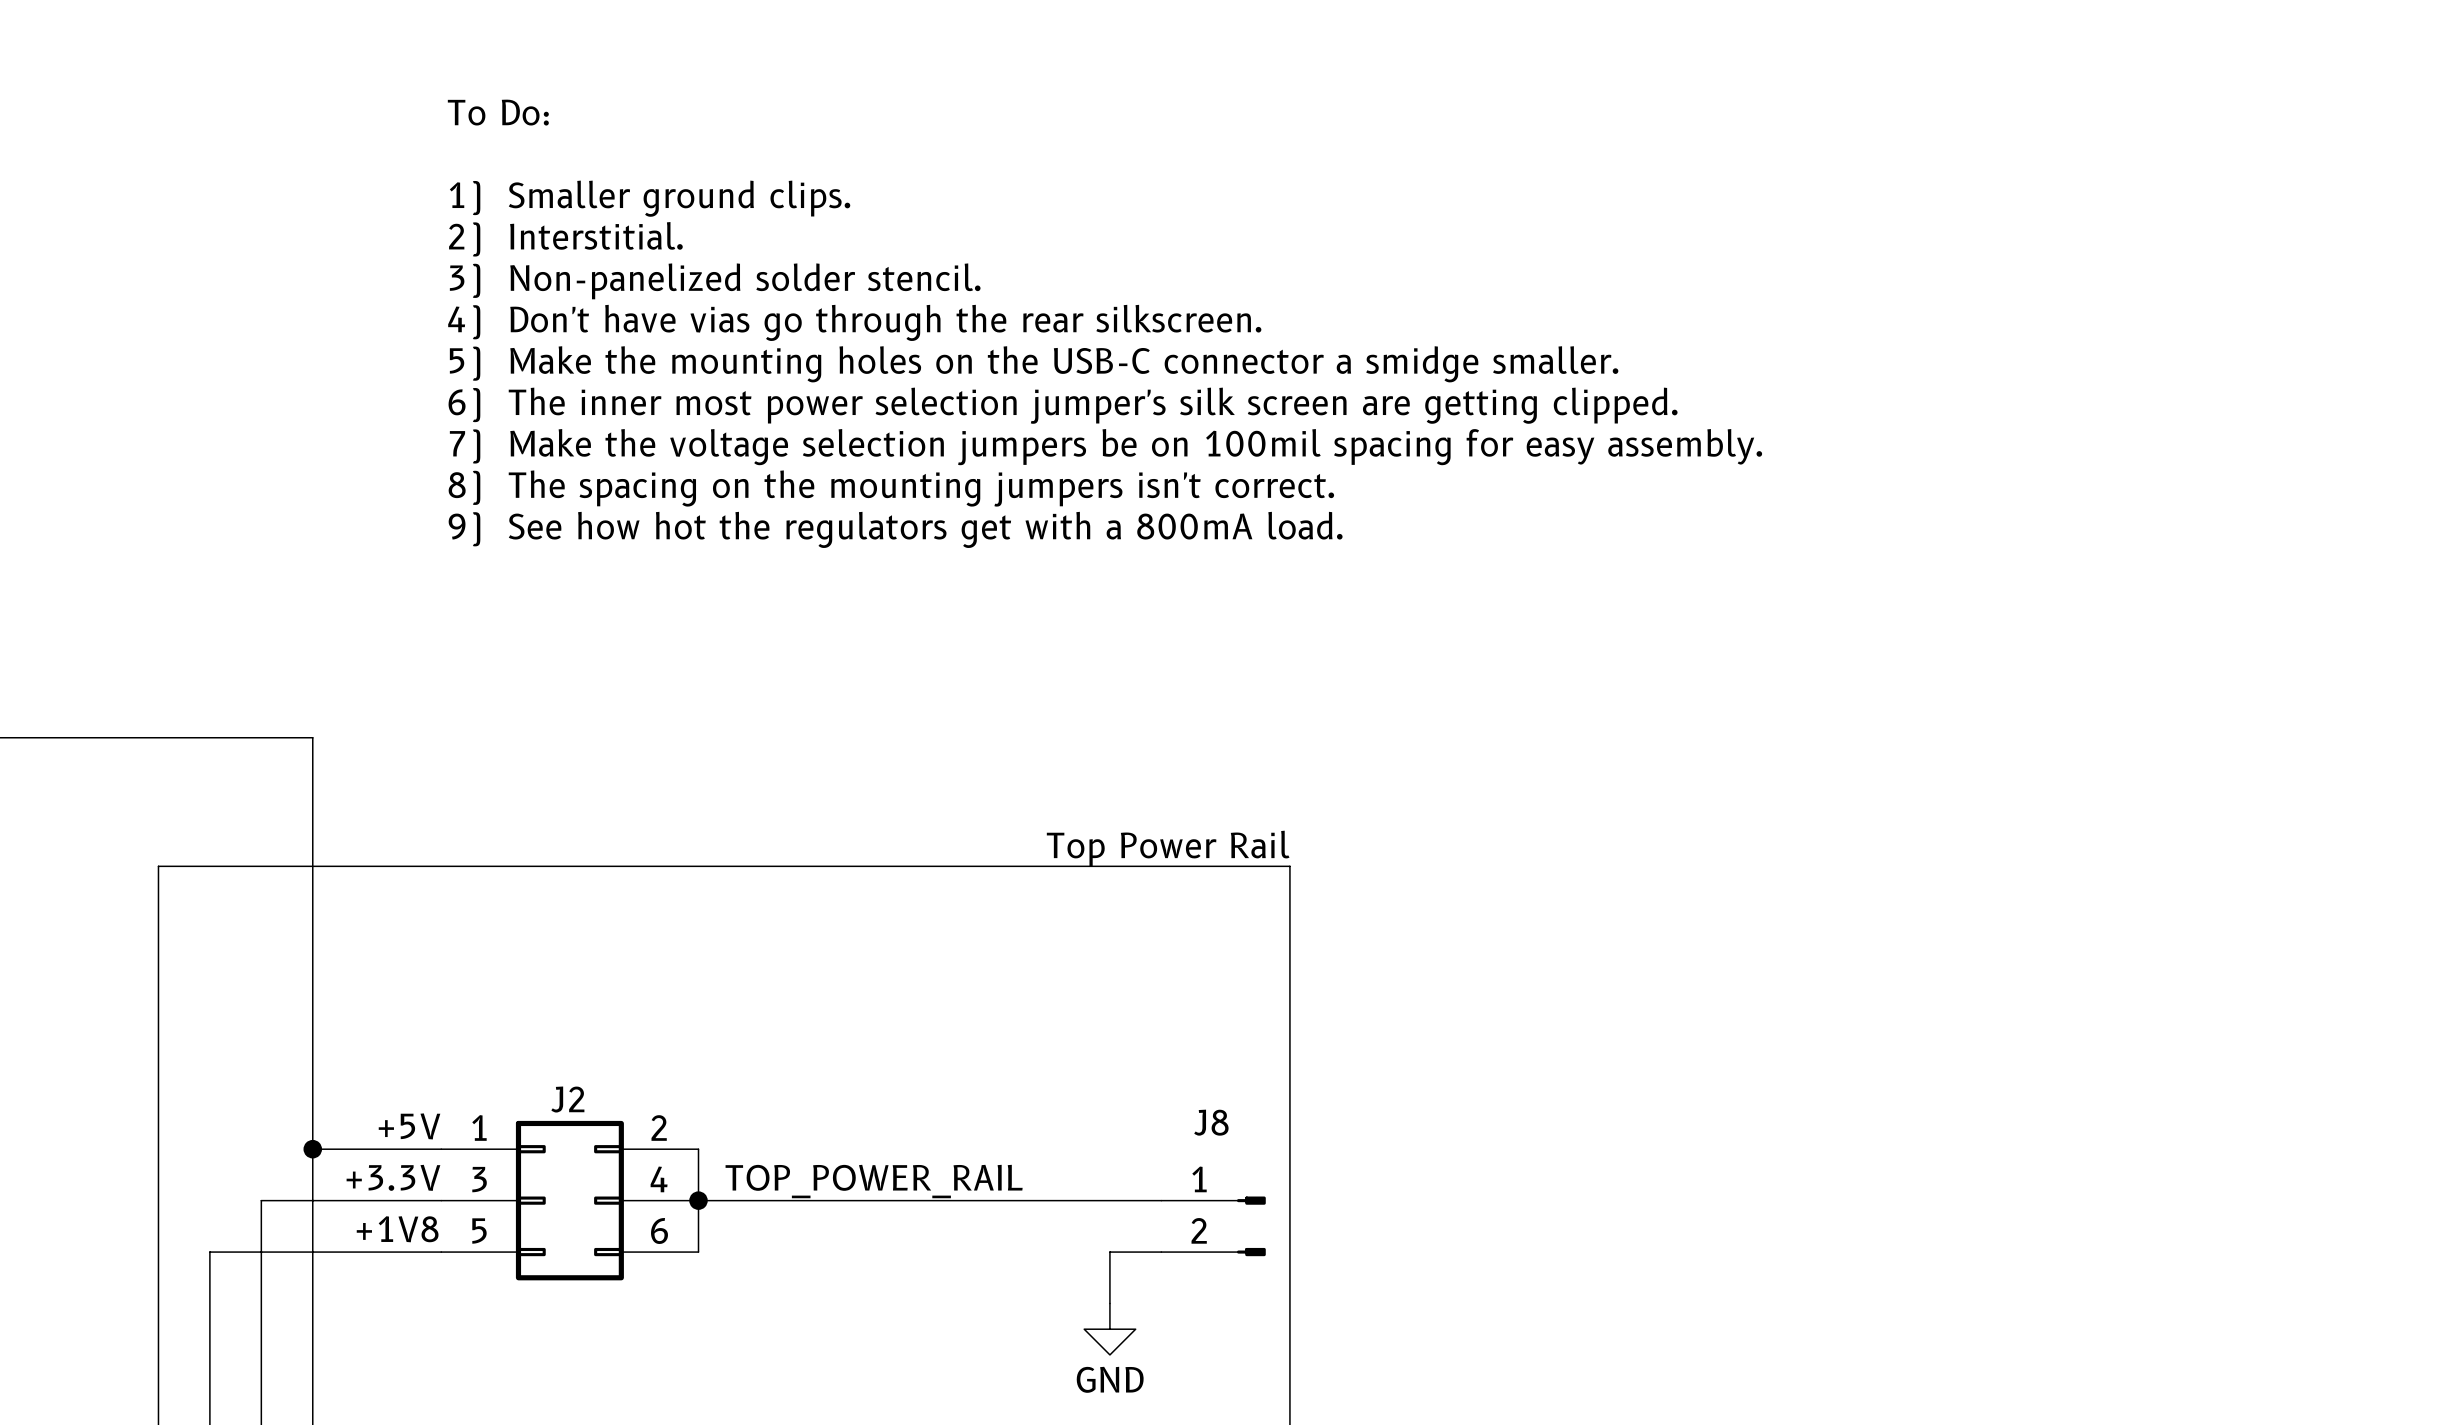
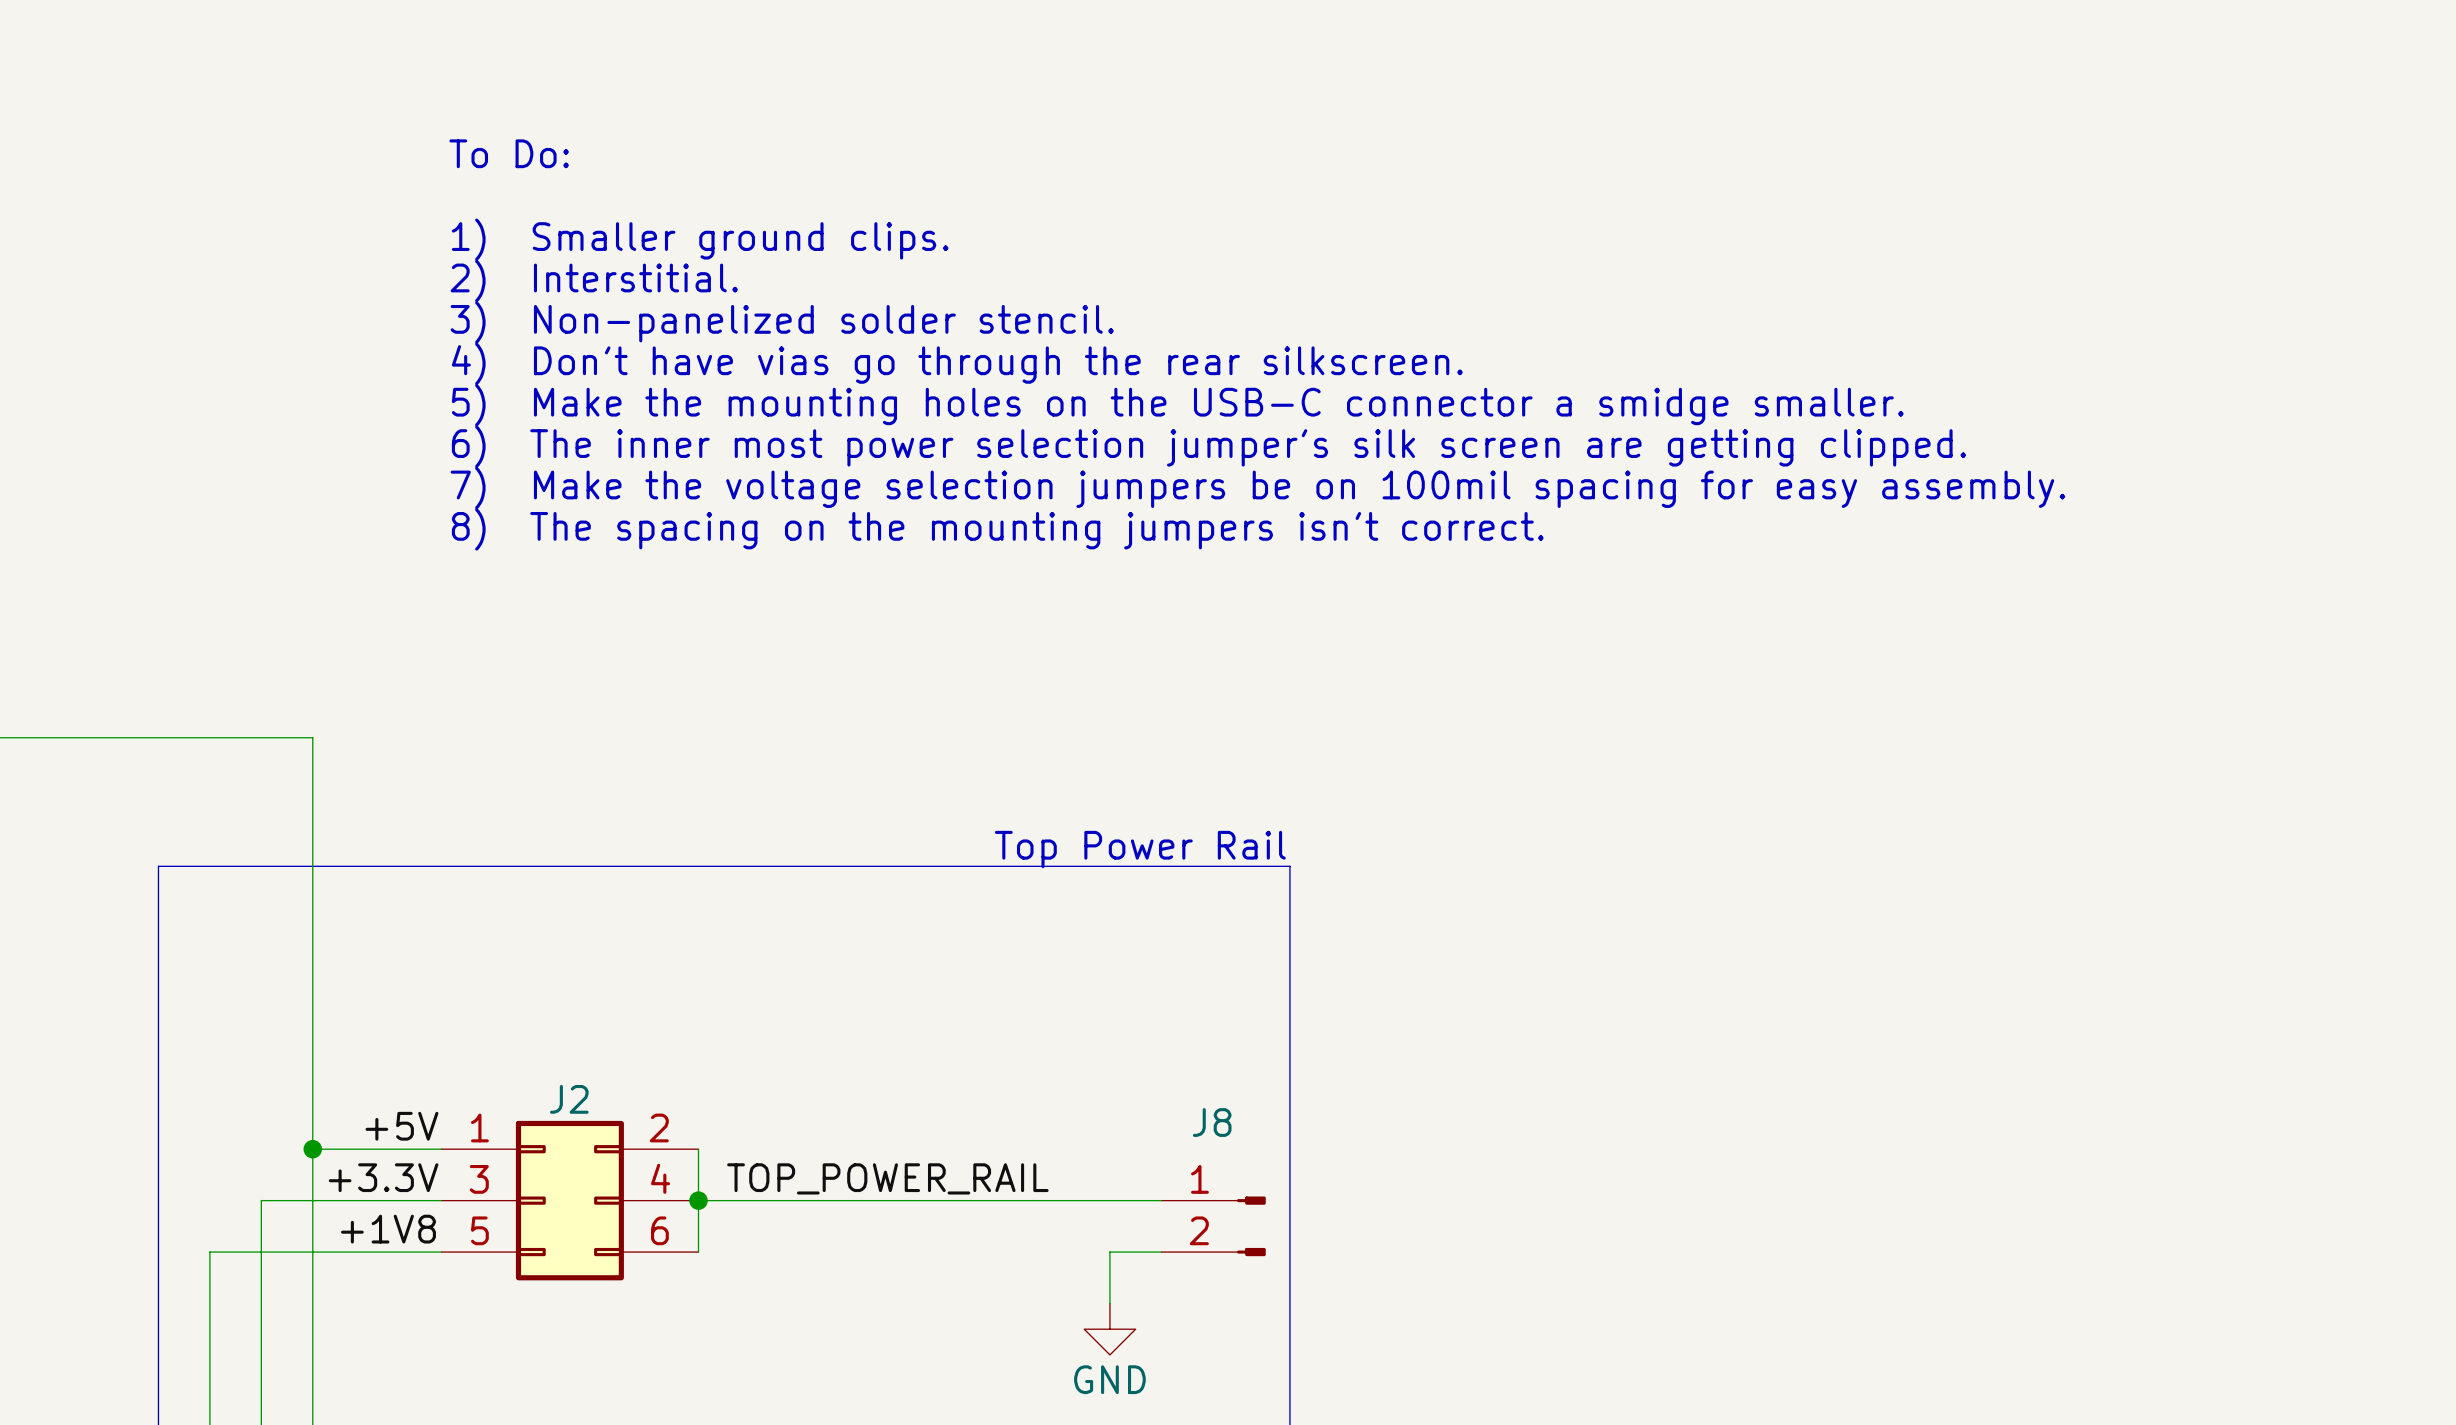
text position: To Do: (498, 112) -> To Do: (509, 153)
text: 1) Smaller ground clips. (650, 198) -> none
text: 2) Interstitial. (565, 239) -> 1) Smaller ground clips. (700, 239)
text: 3) Non-panelized solder stencil. (715, 281) -> 2) Interstitial. (594, 281)
text: 4) Don't have vias go through the rear silkscreen. (854, 322) -> 3) Non-panelized solder stencil. (782, 322)
text: 5) Make the mounting holes on the USB-C connector a smidge smaller. (1034, 364) -> 4) Don't have vias go through the rear silkscreen. (957, 363)
text: 6) The inner most power selection jumper's silk screen are getting clipped. (1063, 405) -> 5) Make the mounting holes on the USB-C connector a smidge smaller. (1177, 405)
text: 7) Make the voltage selection jumpers be on 100mil spacing for easy assembly. (1105, 447) -> 6) The inner most power selection jumper's silk screen are getting clipped. (1208, 446)
text: 8) The spacing on the mounting jumpers isn't correct. (891, 488) -> 7) Make the voltage selection jumpers be on 100mil spacing for easy assembly. (1257, 488)
text: 9) See how hot the regulators get with a 800mA load. (895, 529) -> 8) The spacing on the mounting jumpers isn't correct. (997, 529)

